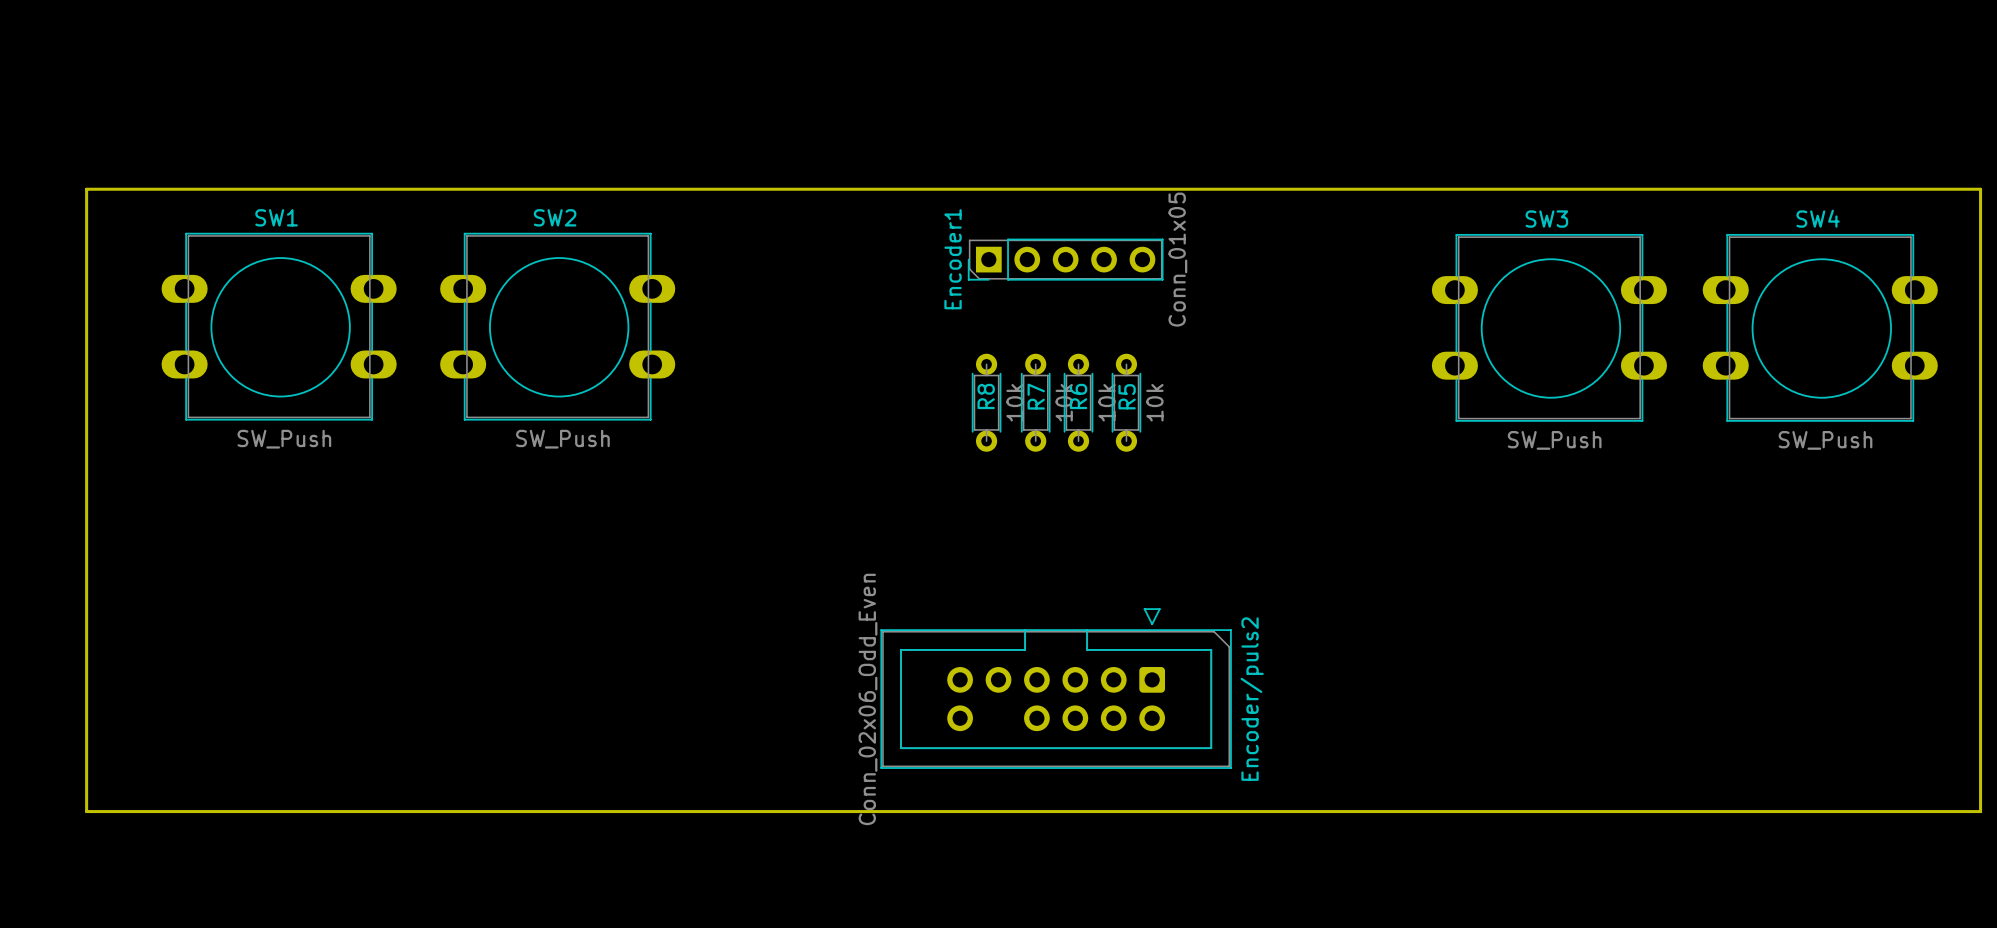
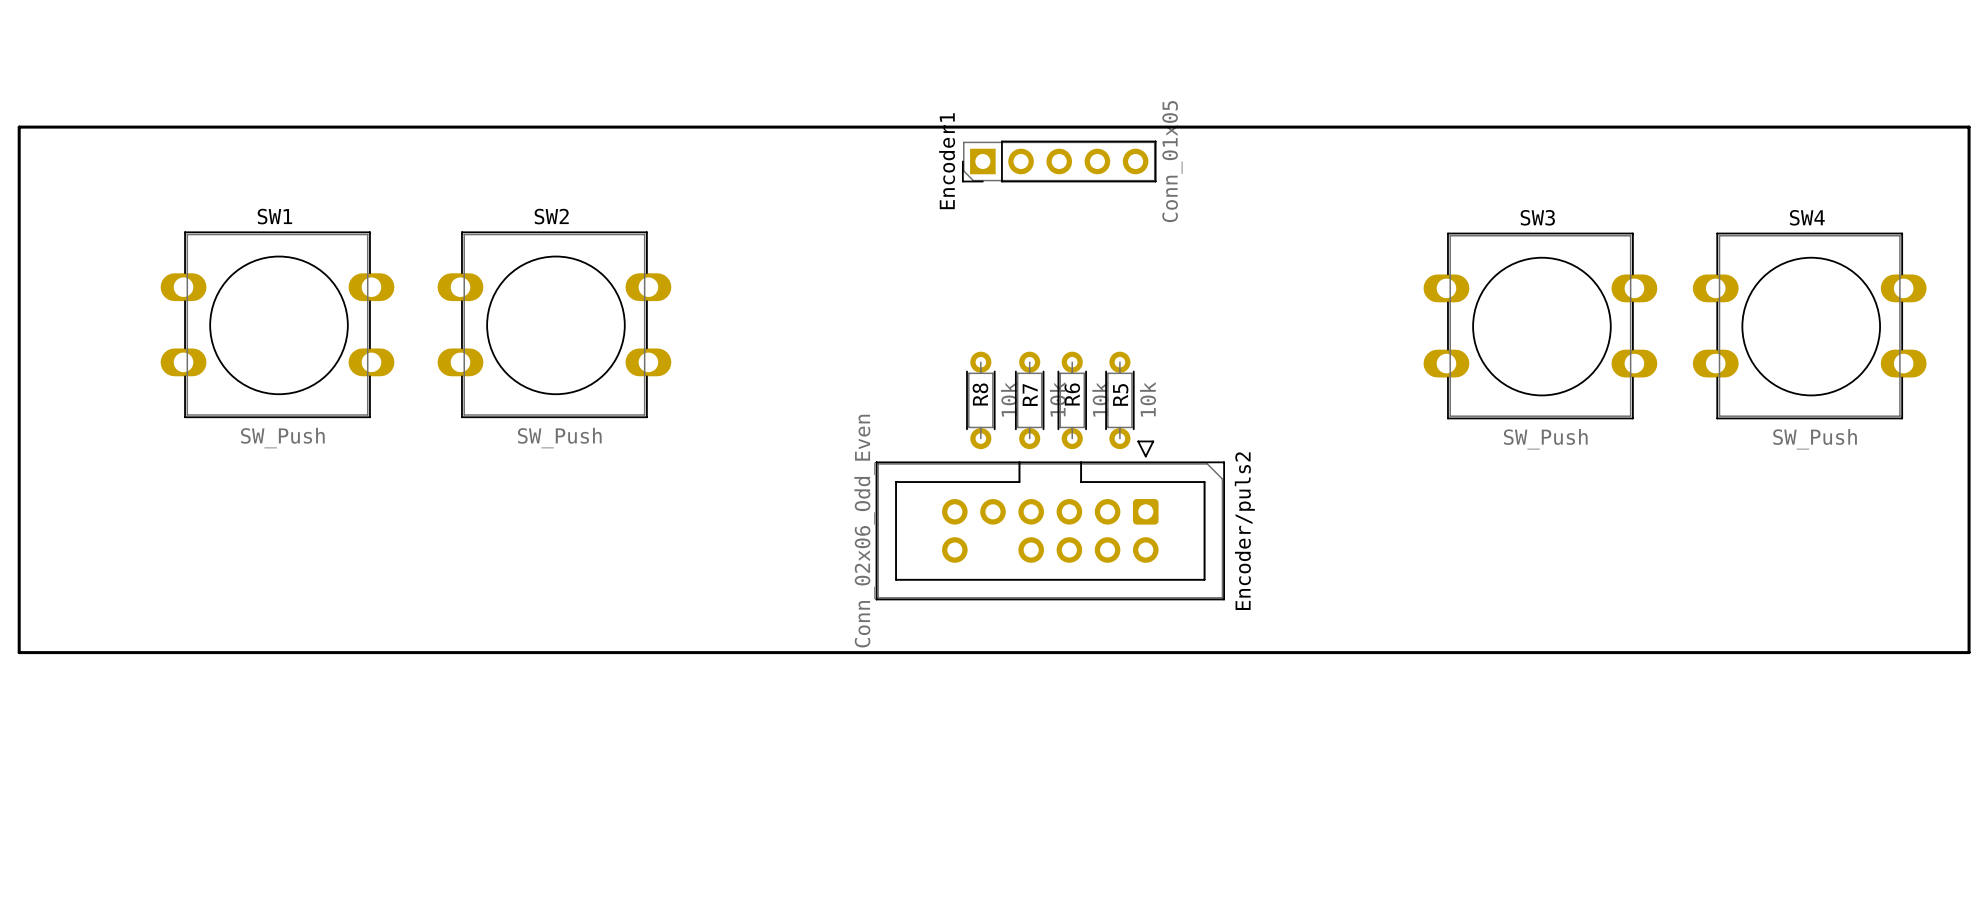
board edge: (1980, 189) (86, 189) (86, 811) (1980, 811) (1980, 656) -> (1969, 188) (1969, 127) (19, 127) (19, 652) (1969, 652)
Encoder1 position: (1065, 259) -> (1059, 161)
Encoder/puls2 position: (1056, 688) -> (1050, 520)

